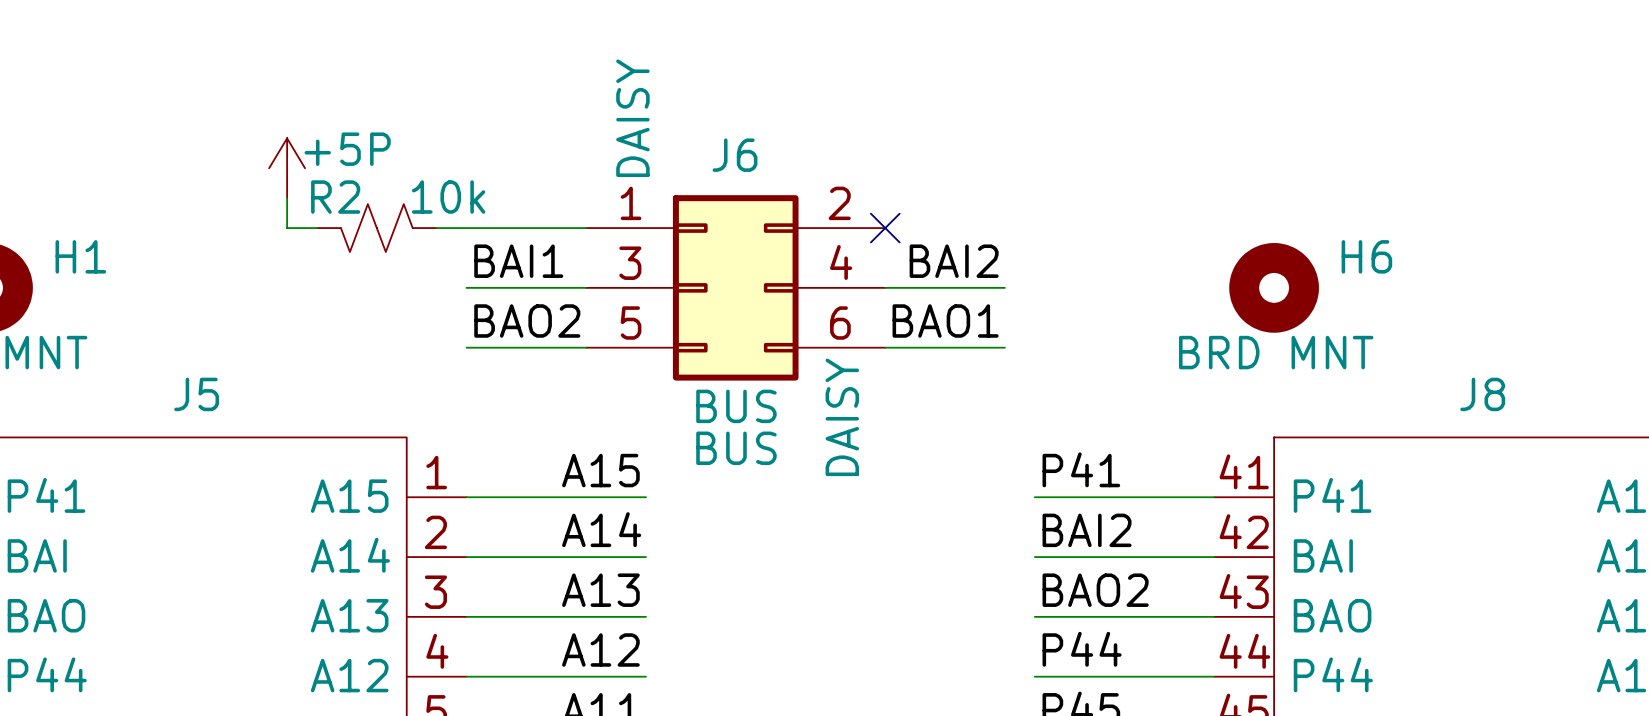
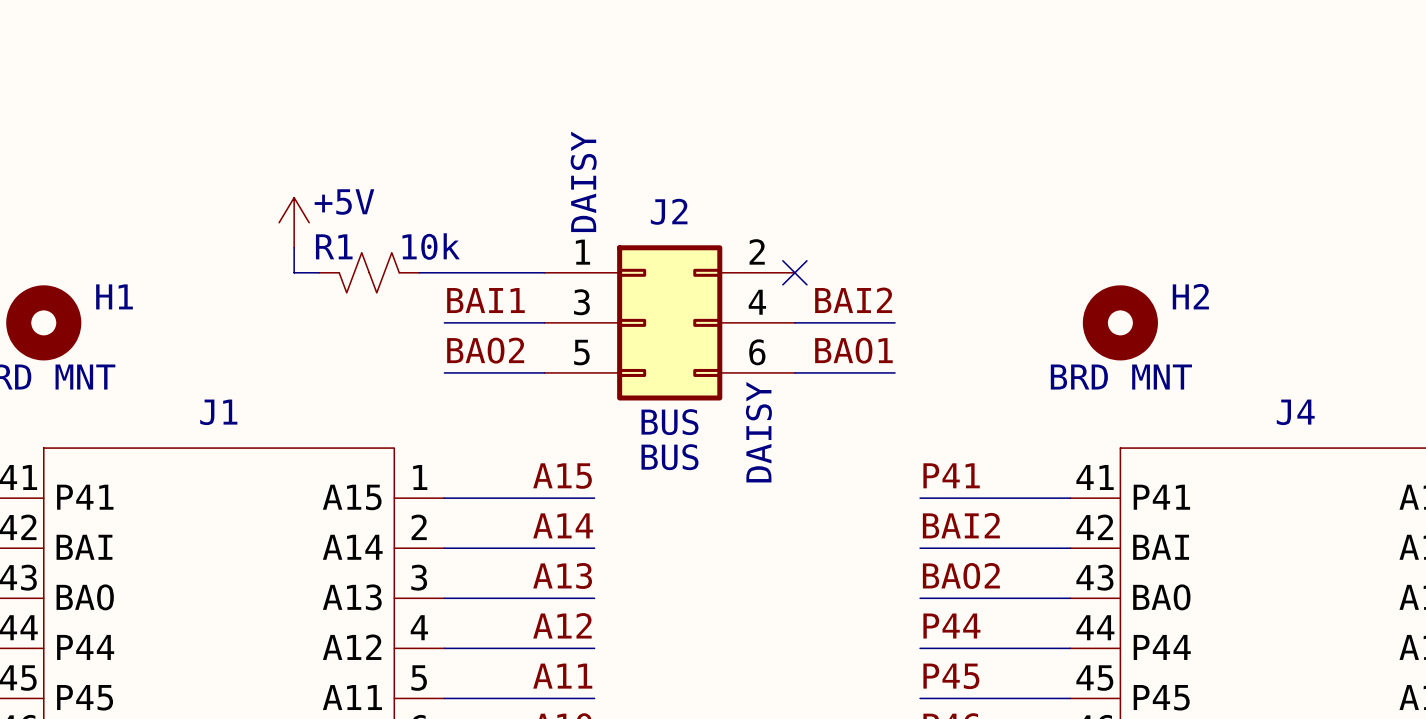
J6 name: J6 (735, 155) -> J2 (669, 211)
power symbol: +5P (287, 168) -> +5V (294, 222)
R2 name: R2 (335, 197) -> R1 (334, 246)
H6 name: H6 (1366, 256) -> H2 (1190, 296)
J5 name: J5 (196, 394) -> J1 (218, 412)
J8 name: J8 (1482, 394) -> J4 (1295, 412)

